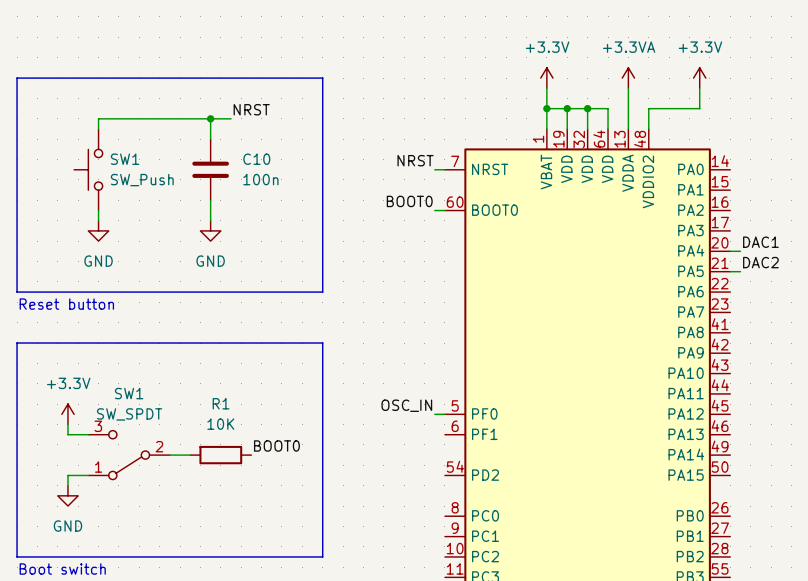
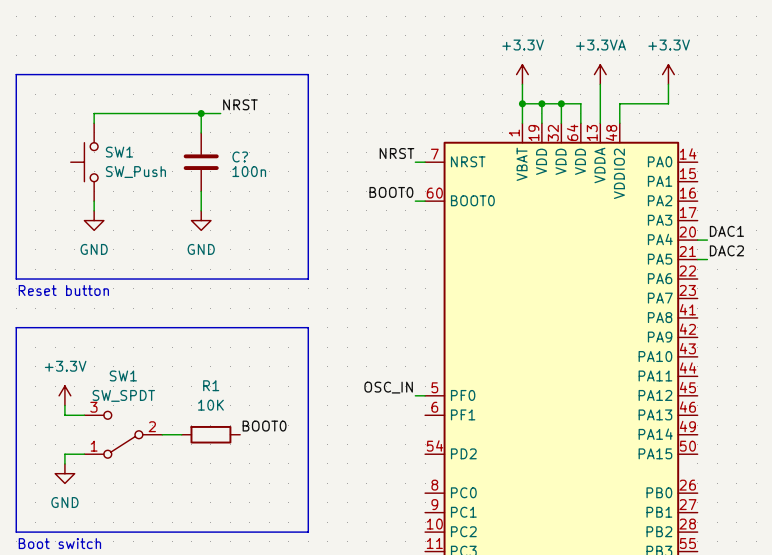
C10 name: C10 (256, 159) -> C? (240, 156)

